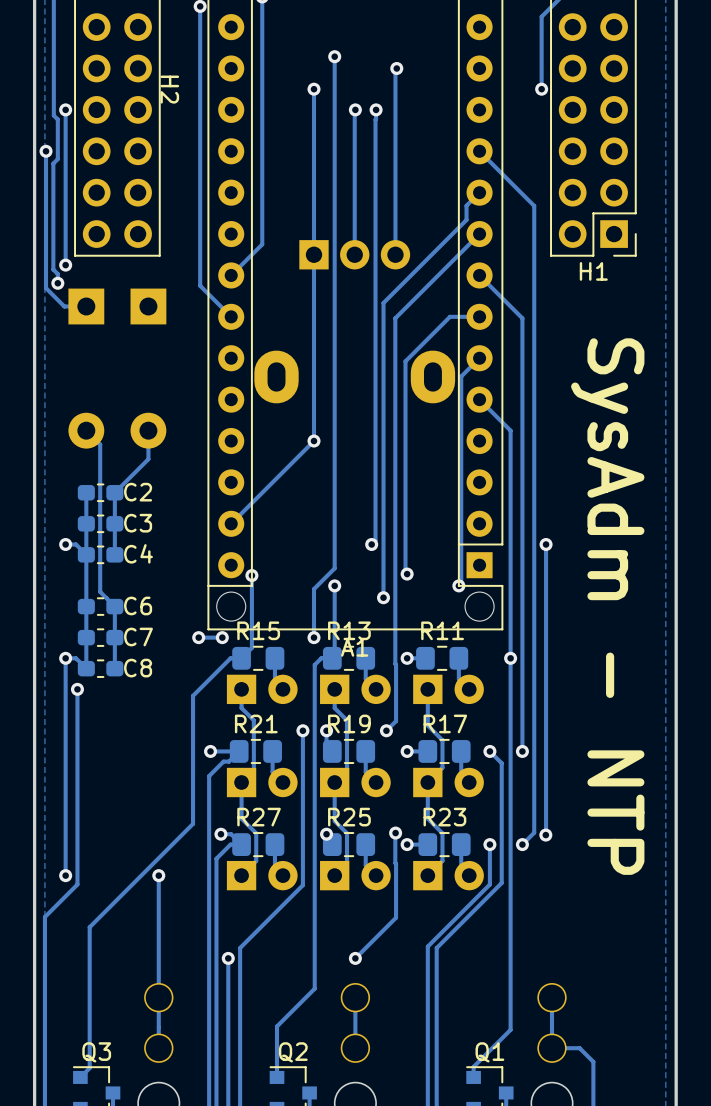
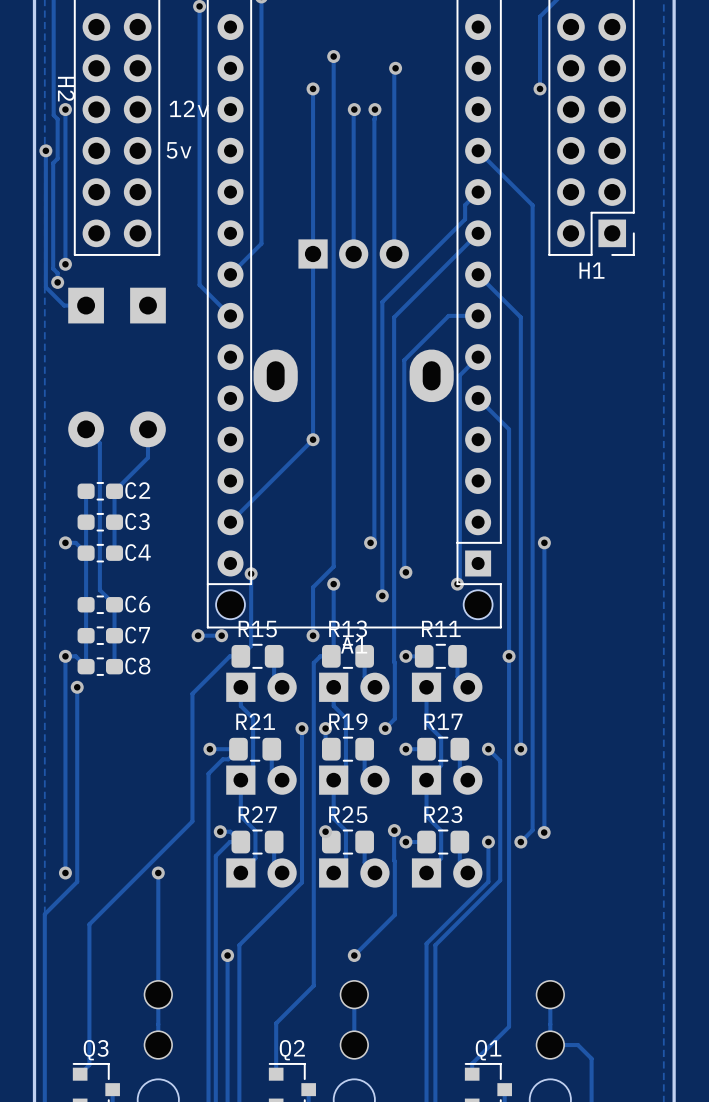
H2 name position: H2 (169, 89) -> H2 (66, 89)
H2 text: none -> 12v (189, 108)
H2 text: none -> 5v (179, 150)
text: SysAdm - NTP (607, 606) -> none

